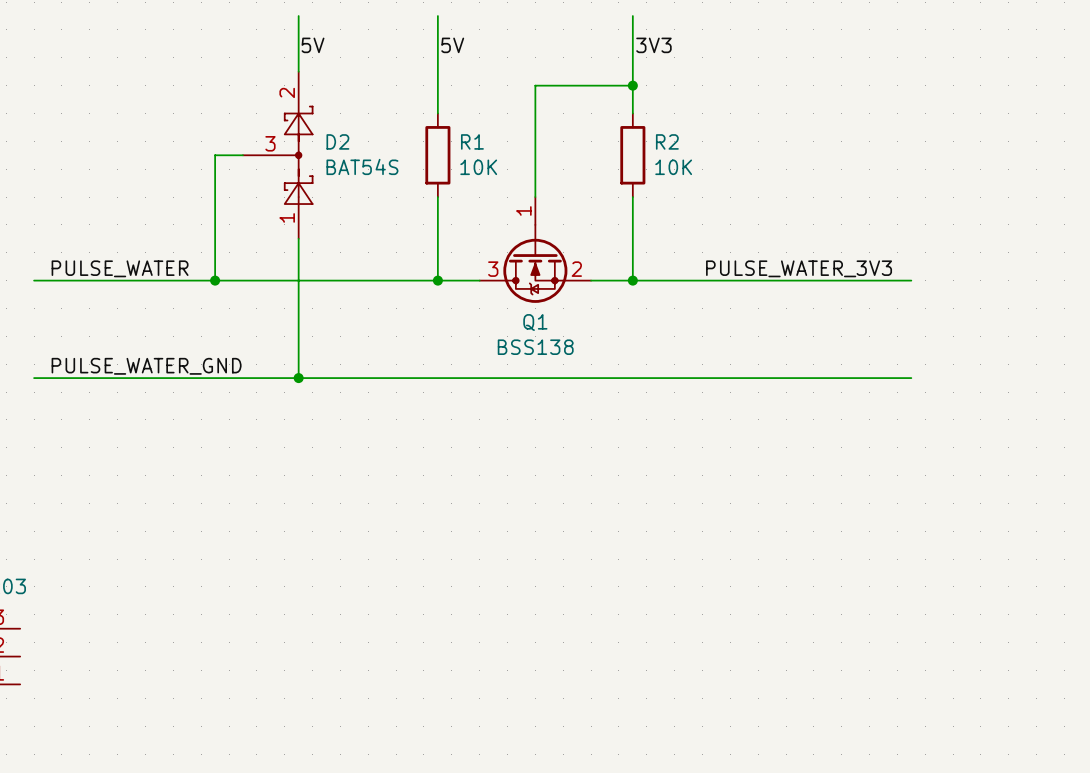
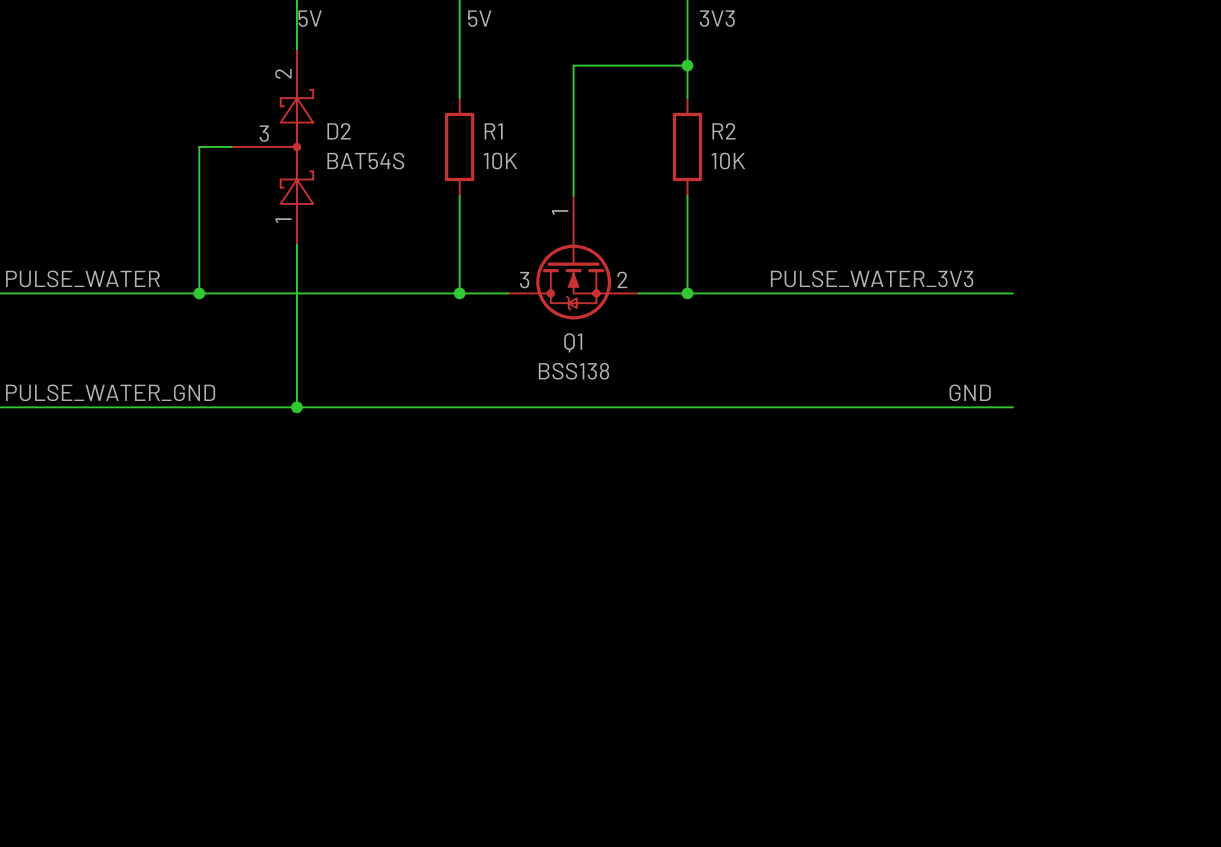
label: none -> GND (970, 392)

